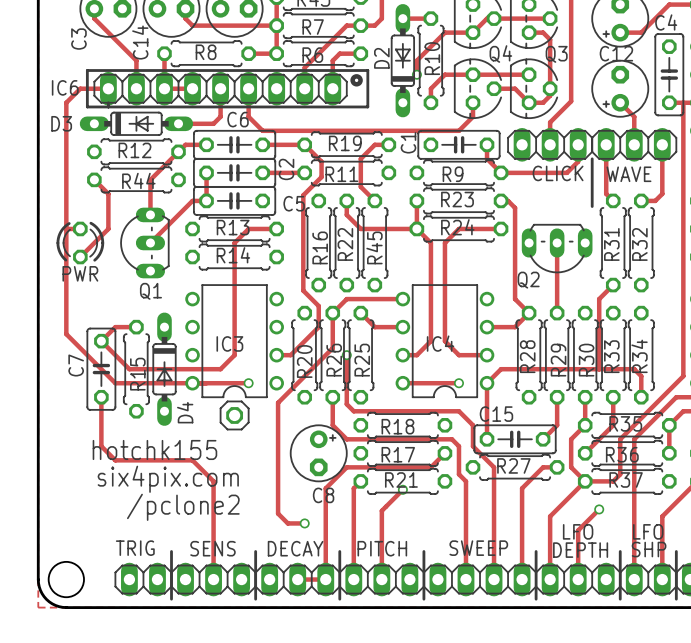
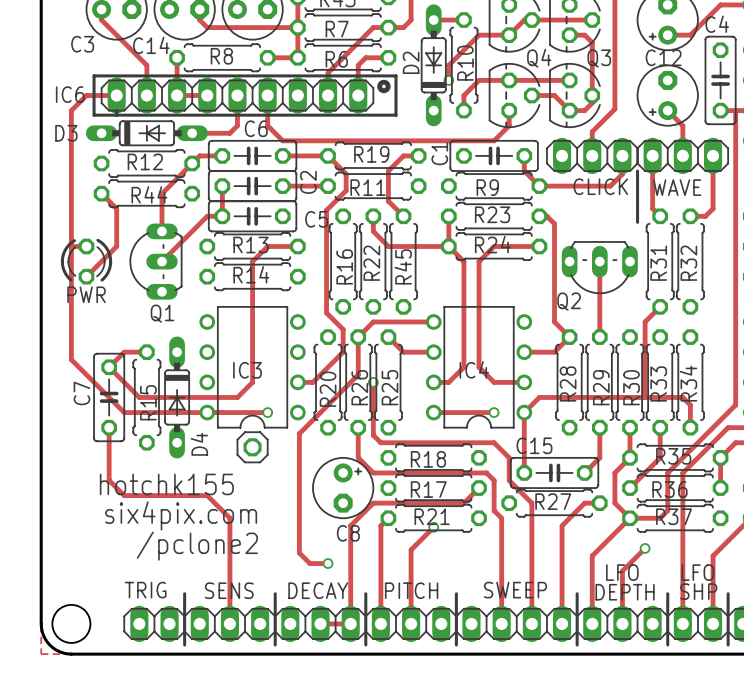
C3 name rotation: 0° (78, 39) -> 90° clockwise (82, 44)
C14 name rotation: 0° (140, 42) -> 90° clockwise (151, 45)

